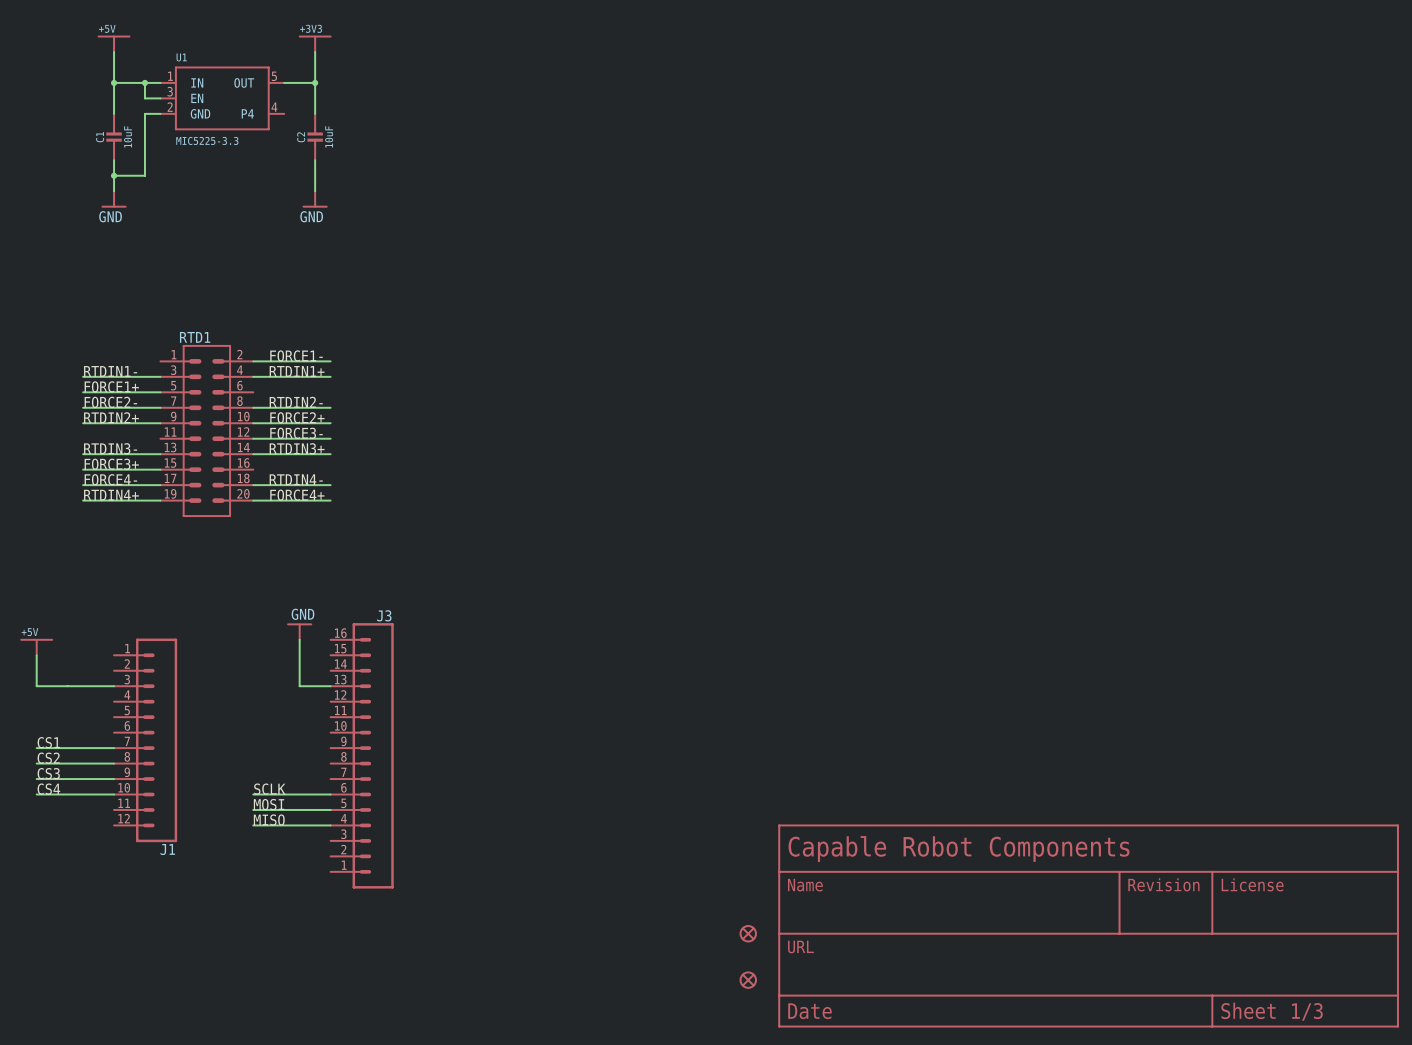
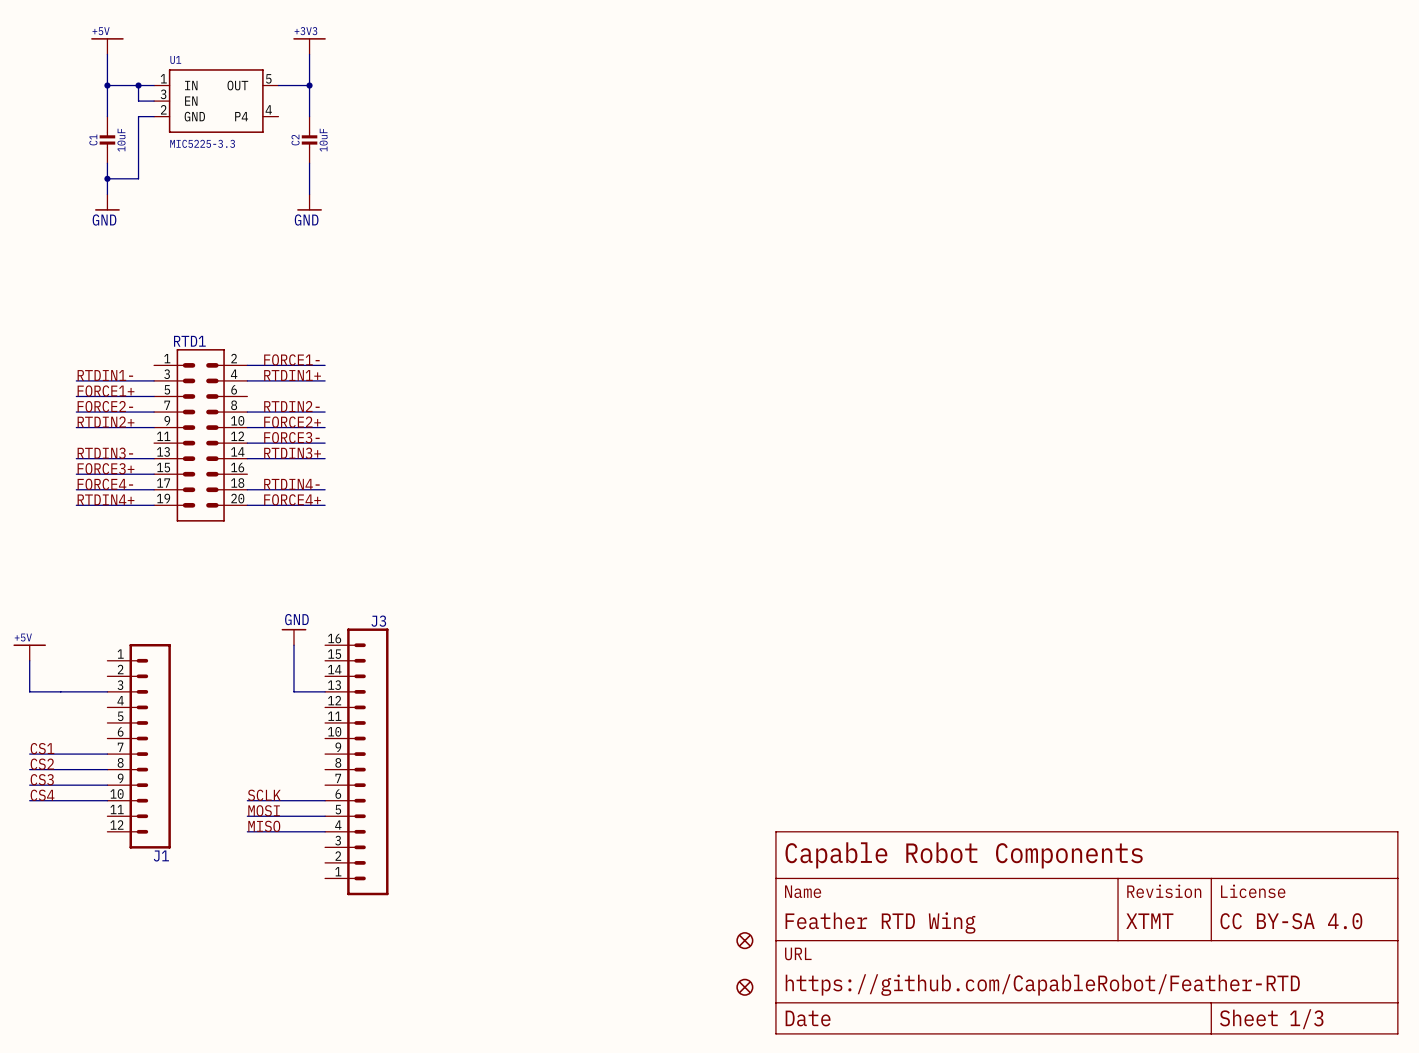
part text: none -> XTMT (1149, 921)
part text: none -> CC BY-SA 4.0 (1291, 921)
part text: none -> Feather RTD Wing (880, 923)
part text: none -> https://github.com/CapableRobot/Feather-RTD (1042, 985)

